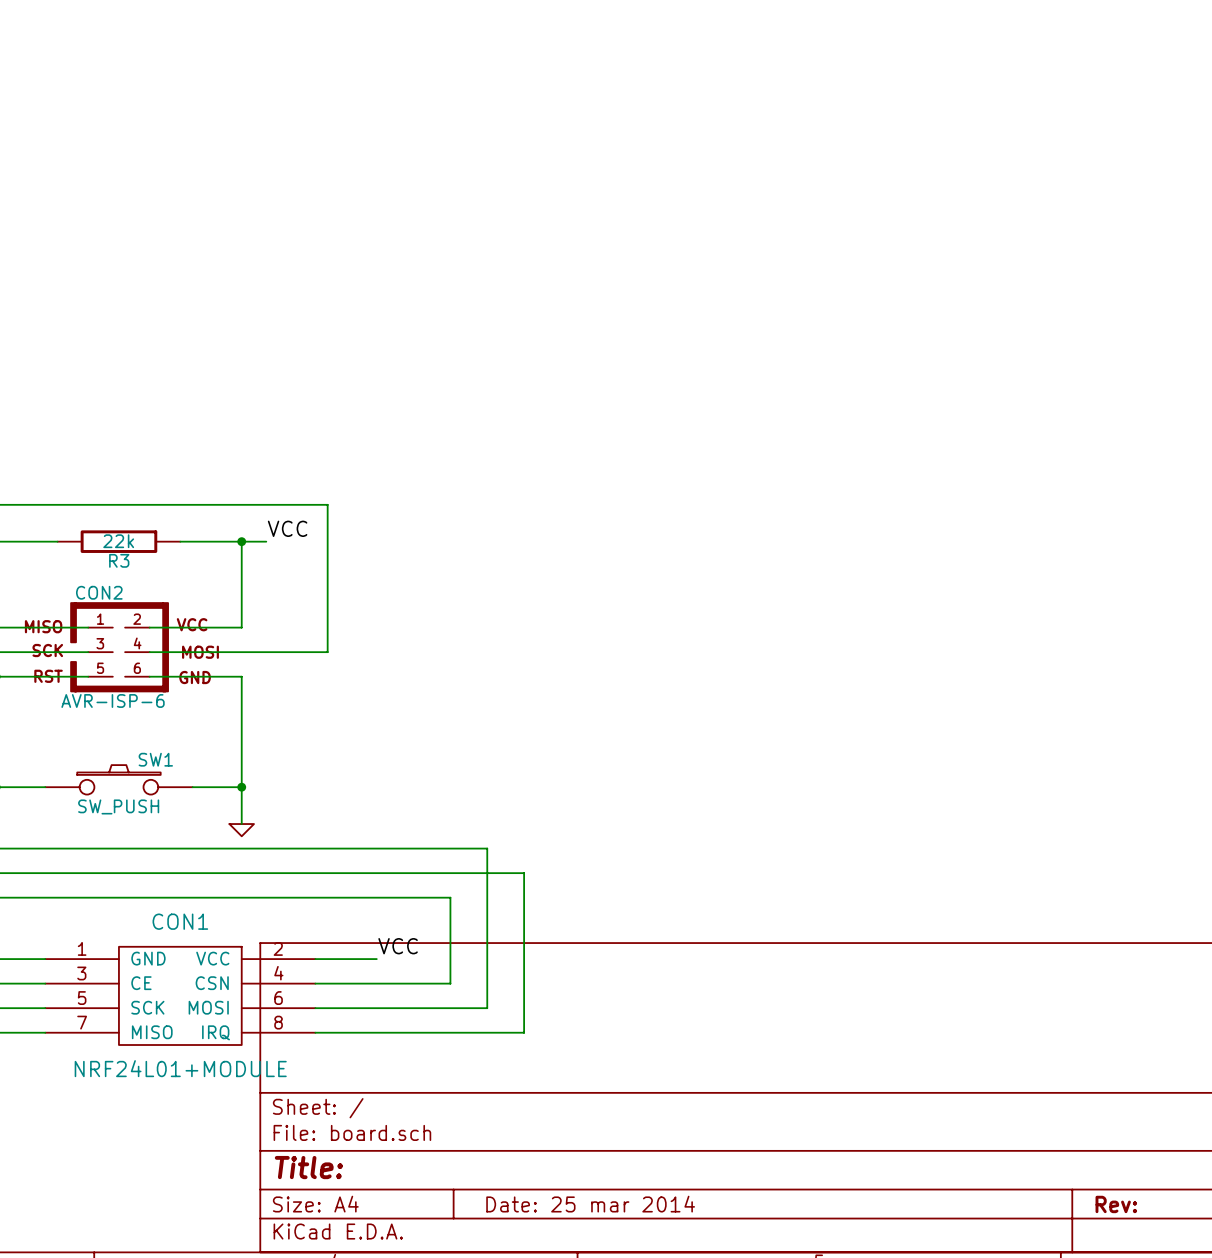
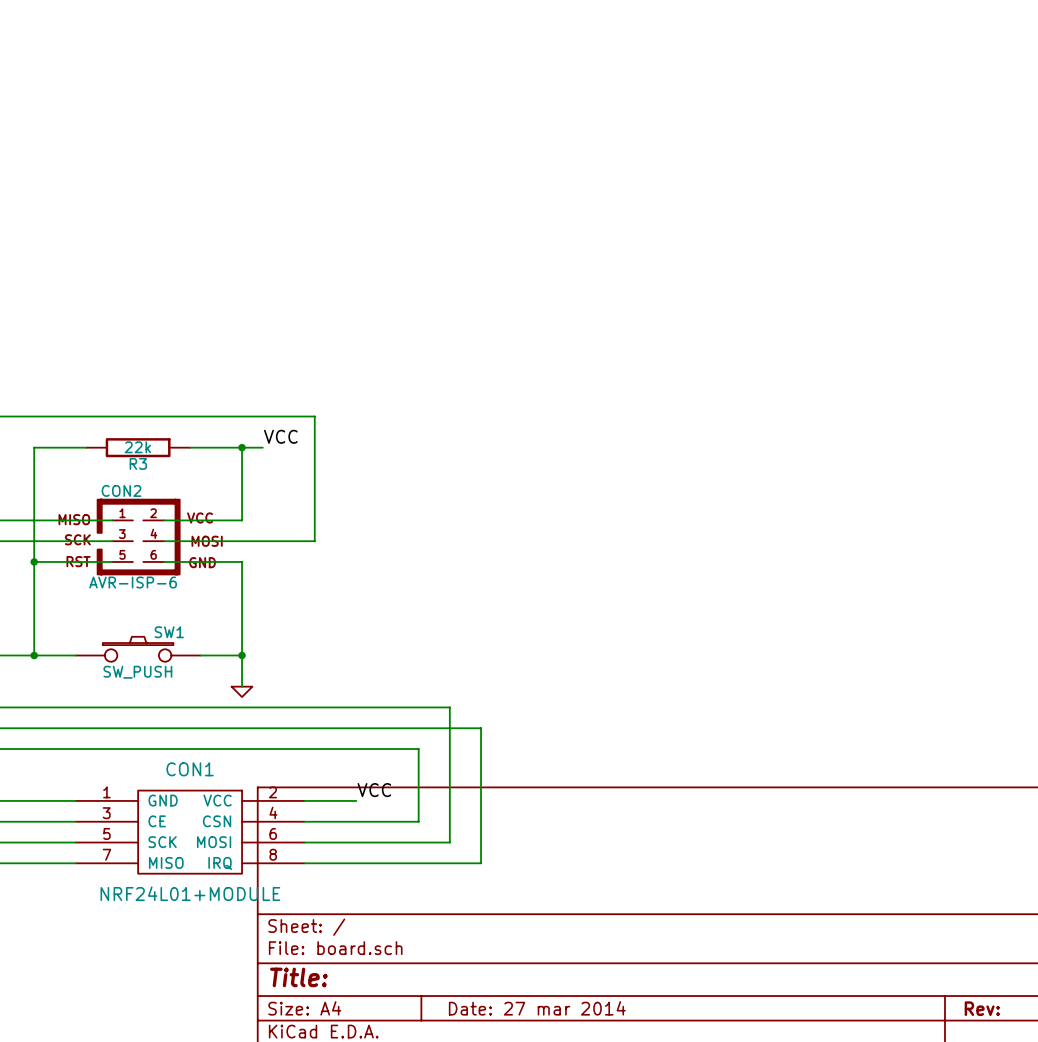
title block: Date: 25 mar 2014 (590, 1204) -> Date: 27 mar 2014 (537, 1008)

